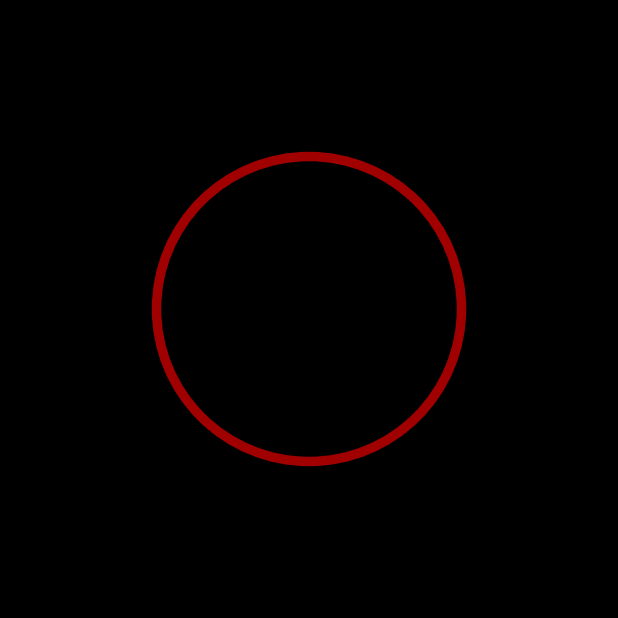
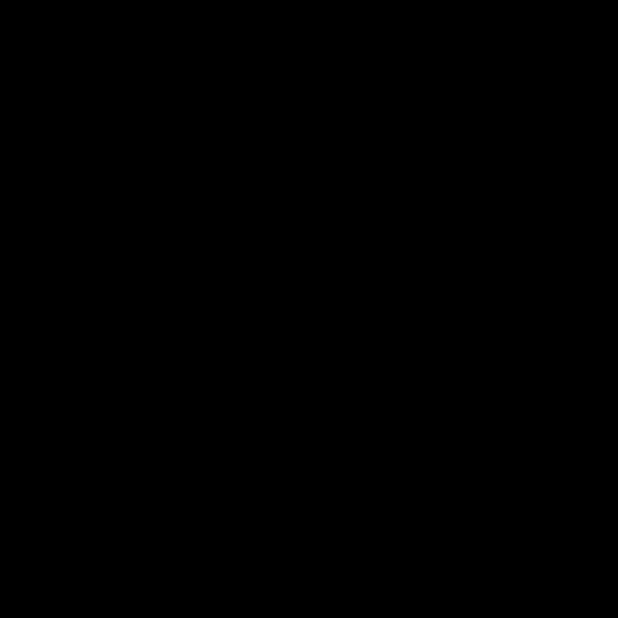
drawing: [151, 151, 467, 467] -> none

